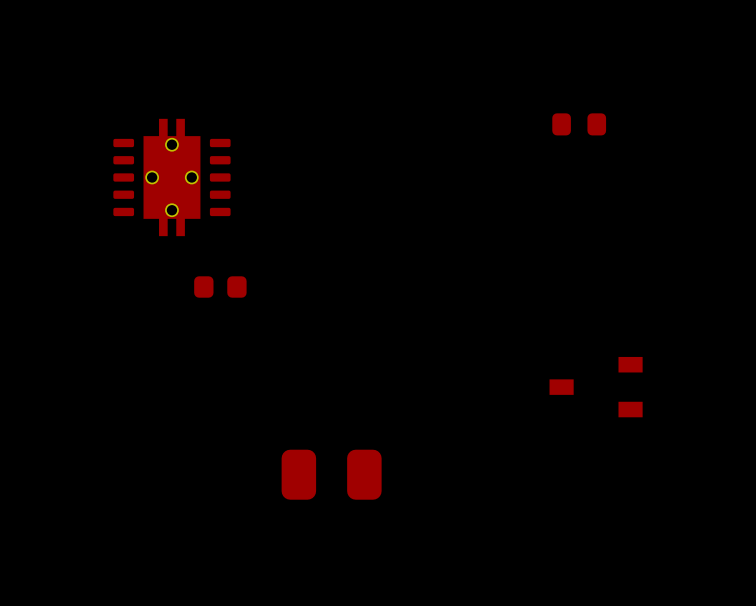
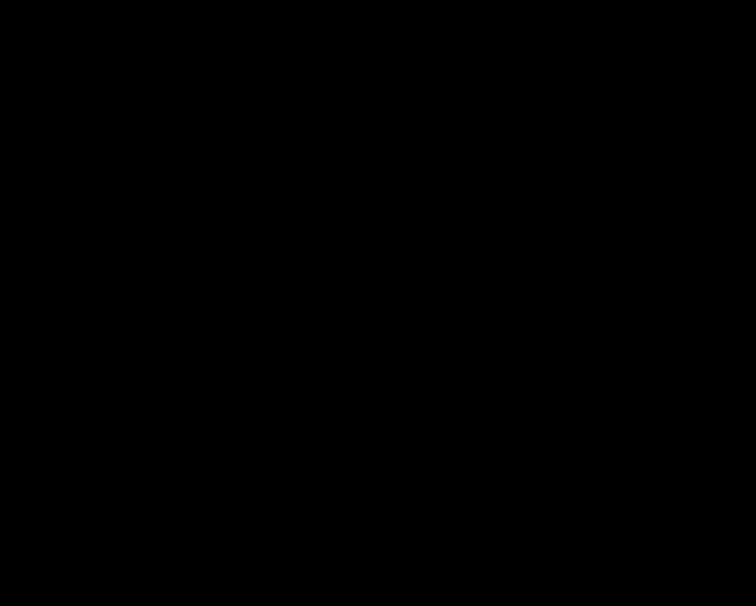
part: (579, 124) -> none
part: (171, 177) -> none
part: (220, 286) -> none
part: (596, 387) -> none
part: (331, 474) -> none

